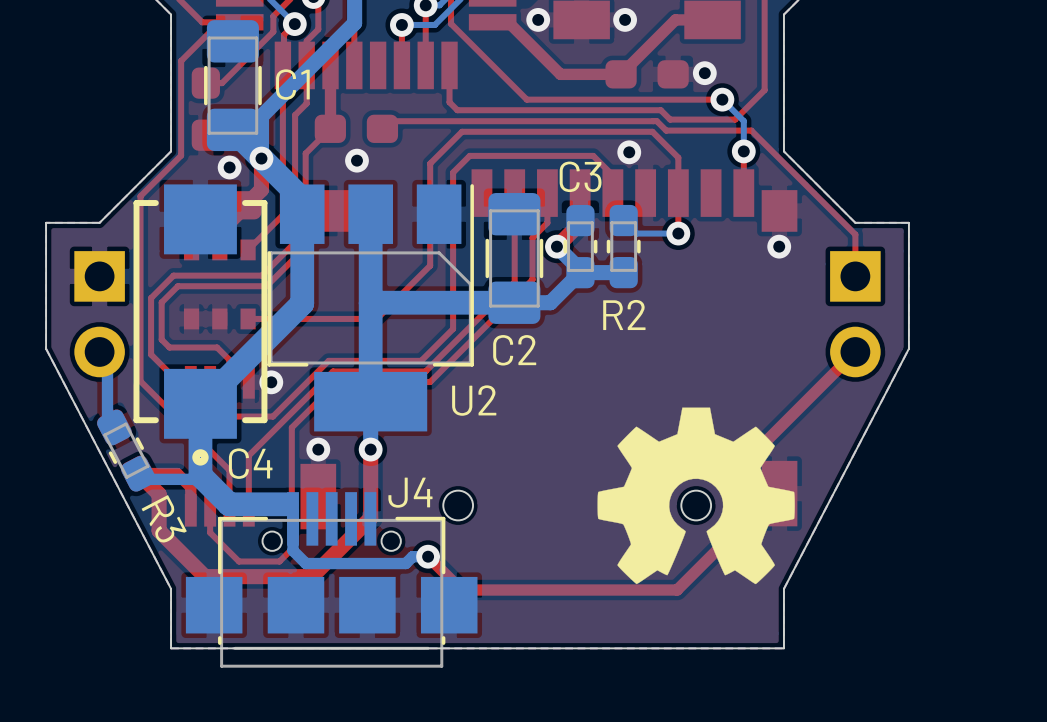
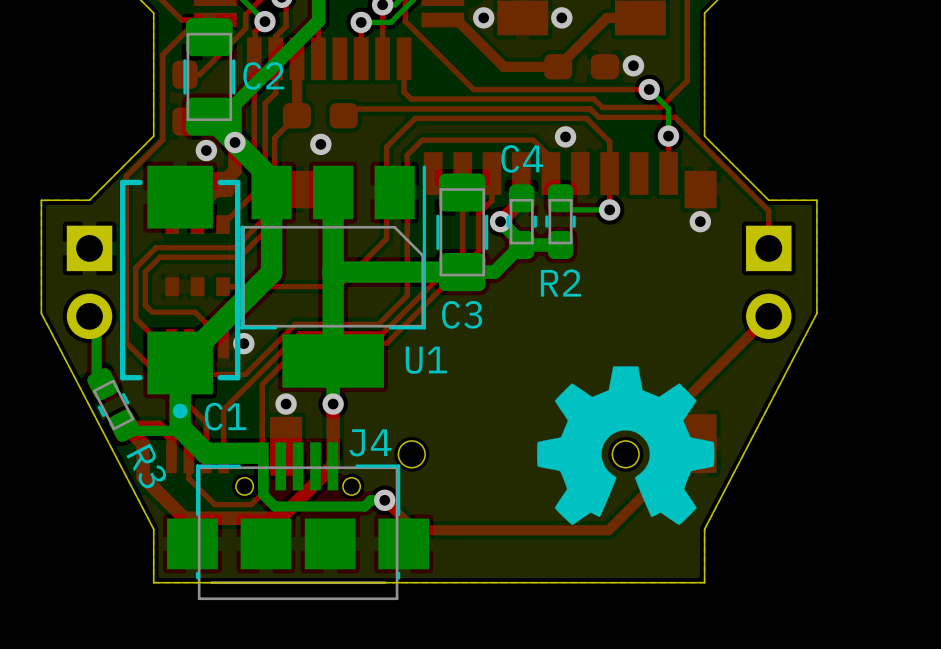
C1 name: C1 (292, 84) -> C2 (263, 75)
C3 name: C3 (580, 176) -> C4 (522, 158)
C2 name: C2 (514, 350) -> C3 (462, 314)
U2 name: U2 (474, 400) -> U1 (426, 360)
C4 name: C4 (250, 463) -> C1 (225, 416)

